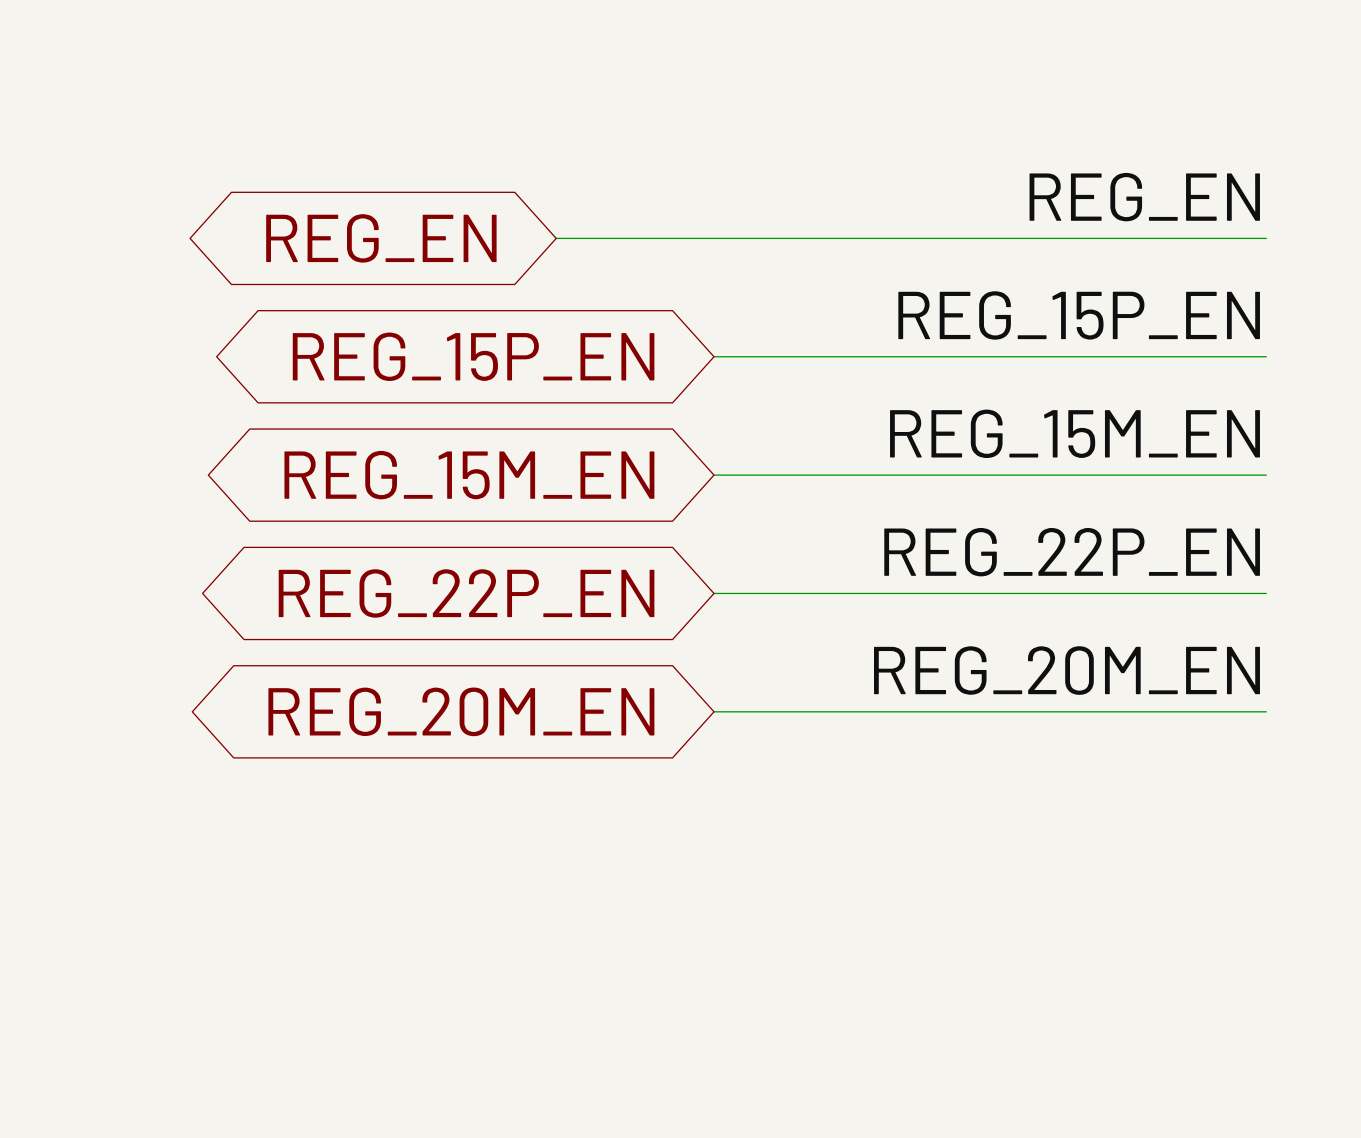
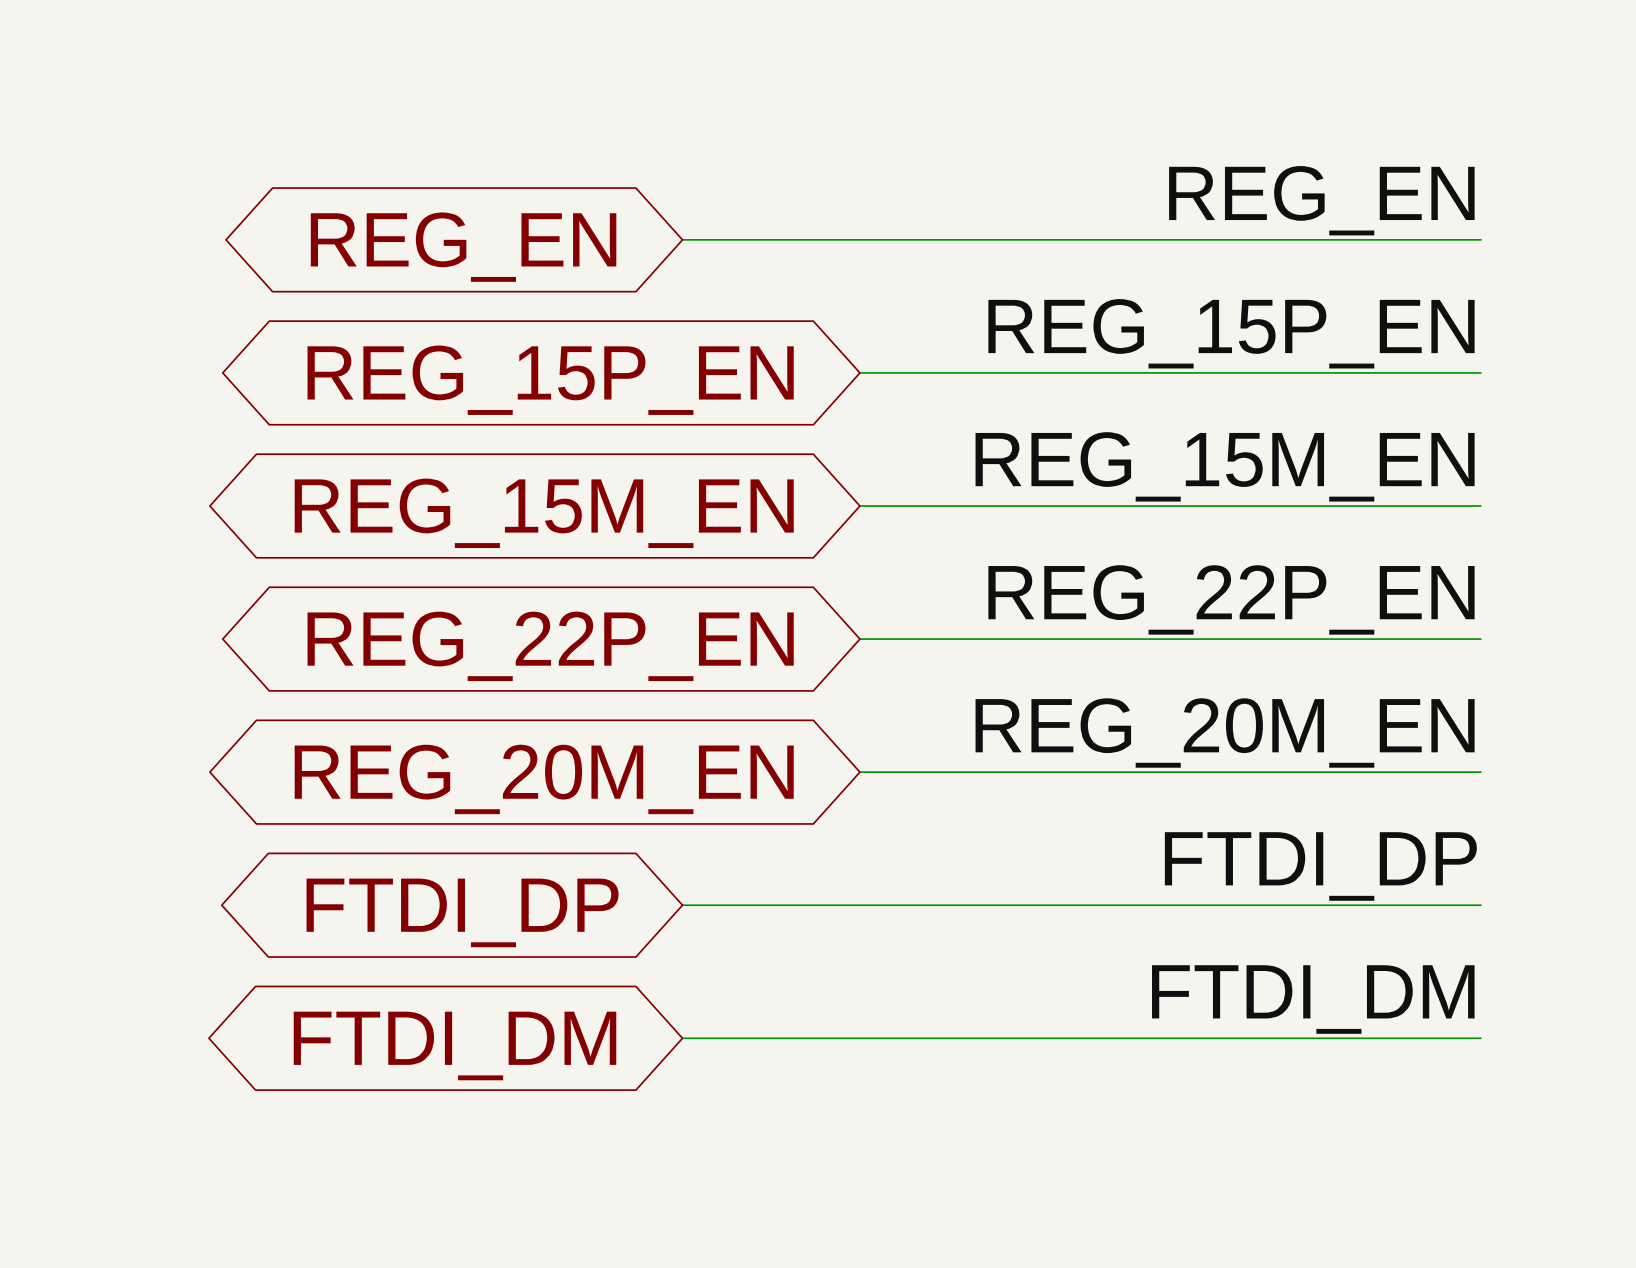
label: none -> FTDI_DP (1320, 866)
global label: none -> FTDI_DP (462, 912)
wire: none -> (682, 905) (1480, 905)
label: none -> FTDI_DM (1313, 999)
global label: none -> FTDI_DM (454, 1045)
wire: none -> (682, 1038) (1480, 1038)

